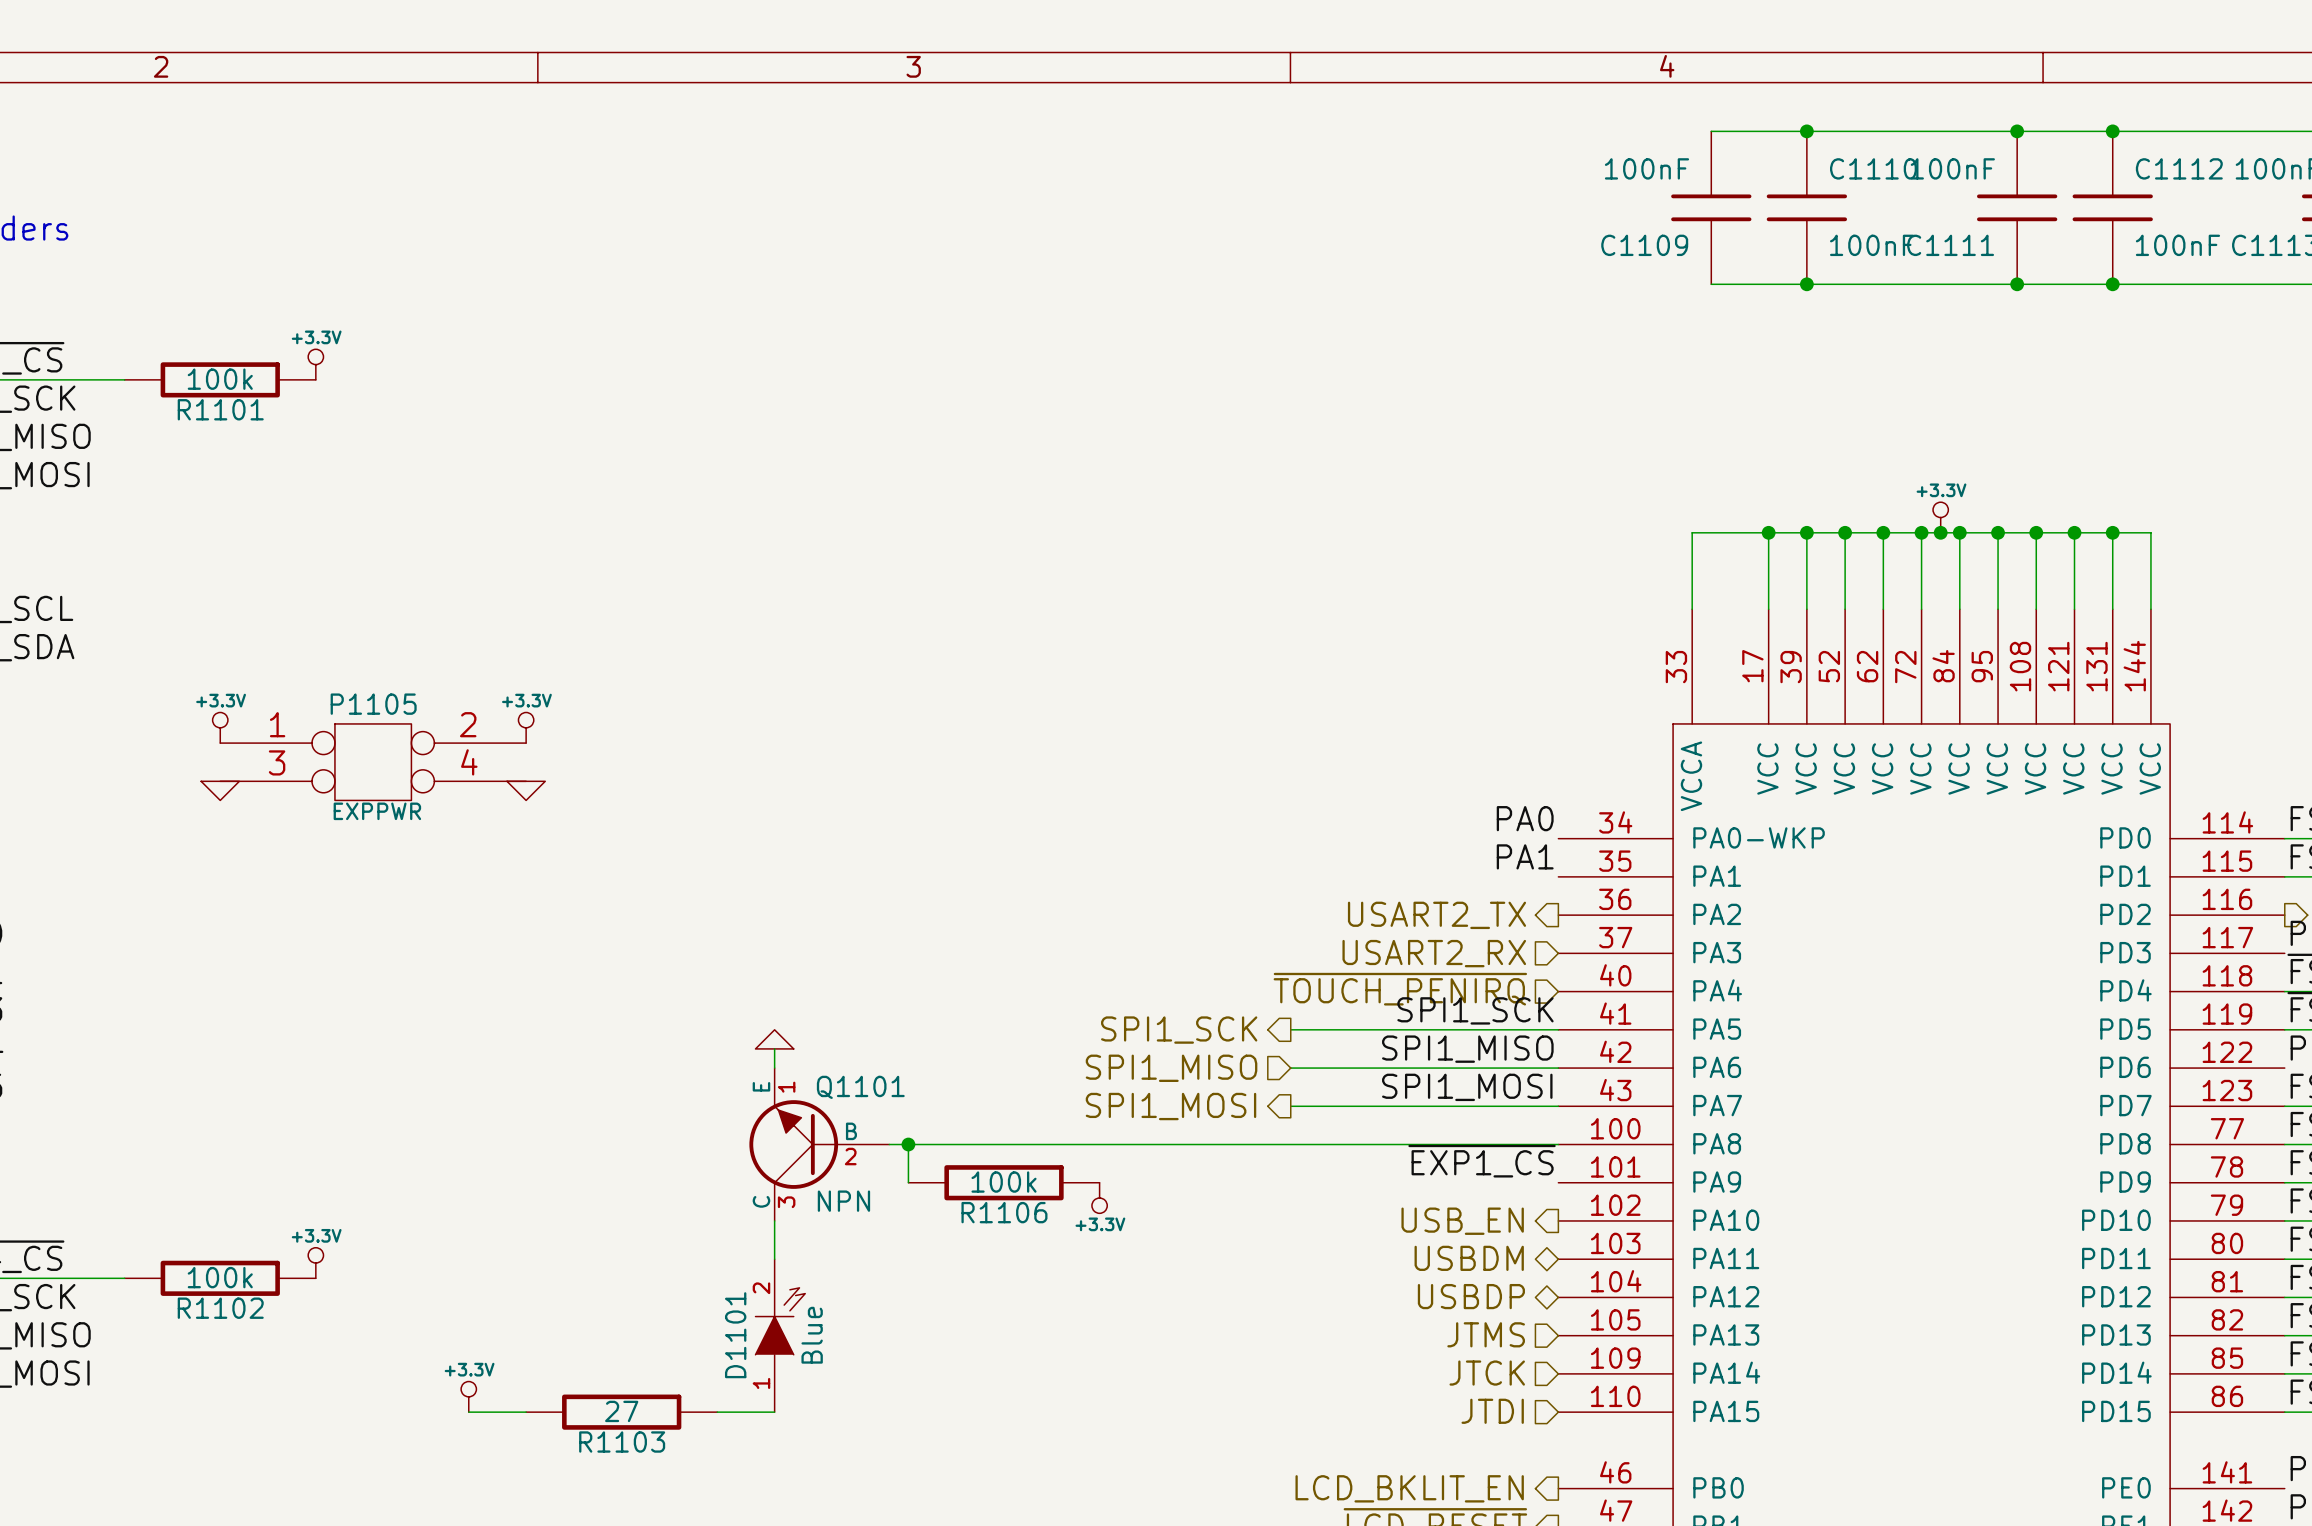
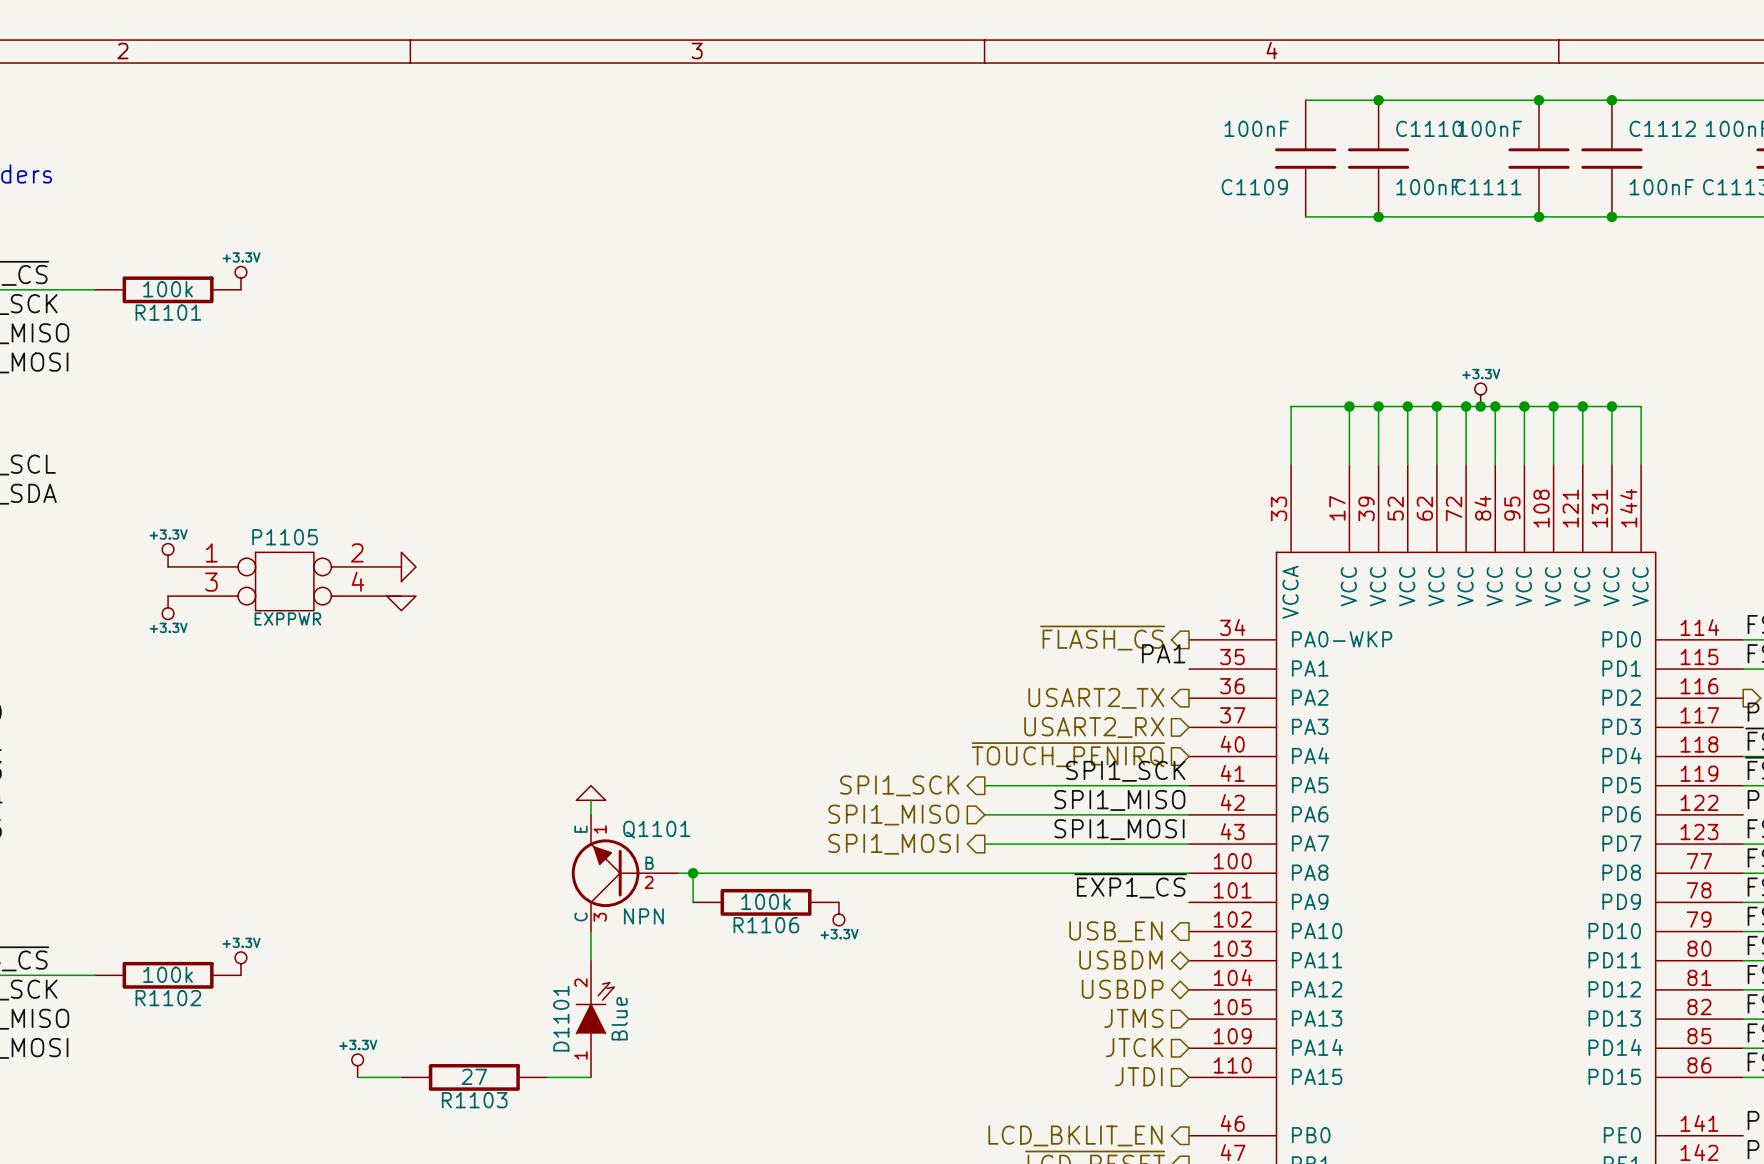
power symbol: +3.3V (526, 727) -> none
power symbol: none -> (408, 566)
power symbol shape: [201, 781, 240, 801] -> [162, 596, 174, 620]
label: PA0 (1525, 818) -> none
power symbol text: none -> +3.3V (168, 627)
hierarchical label: none -> ~{FLASH_CS} (1102, 638)

